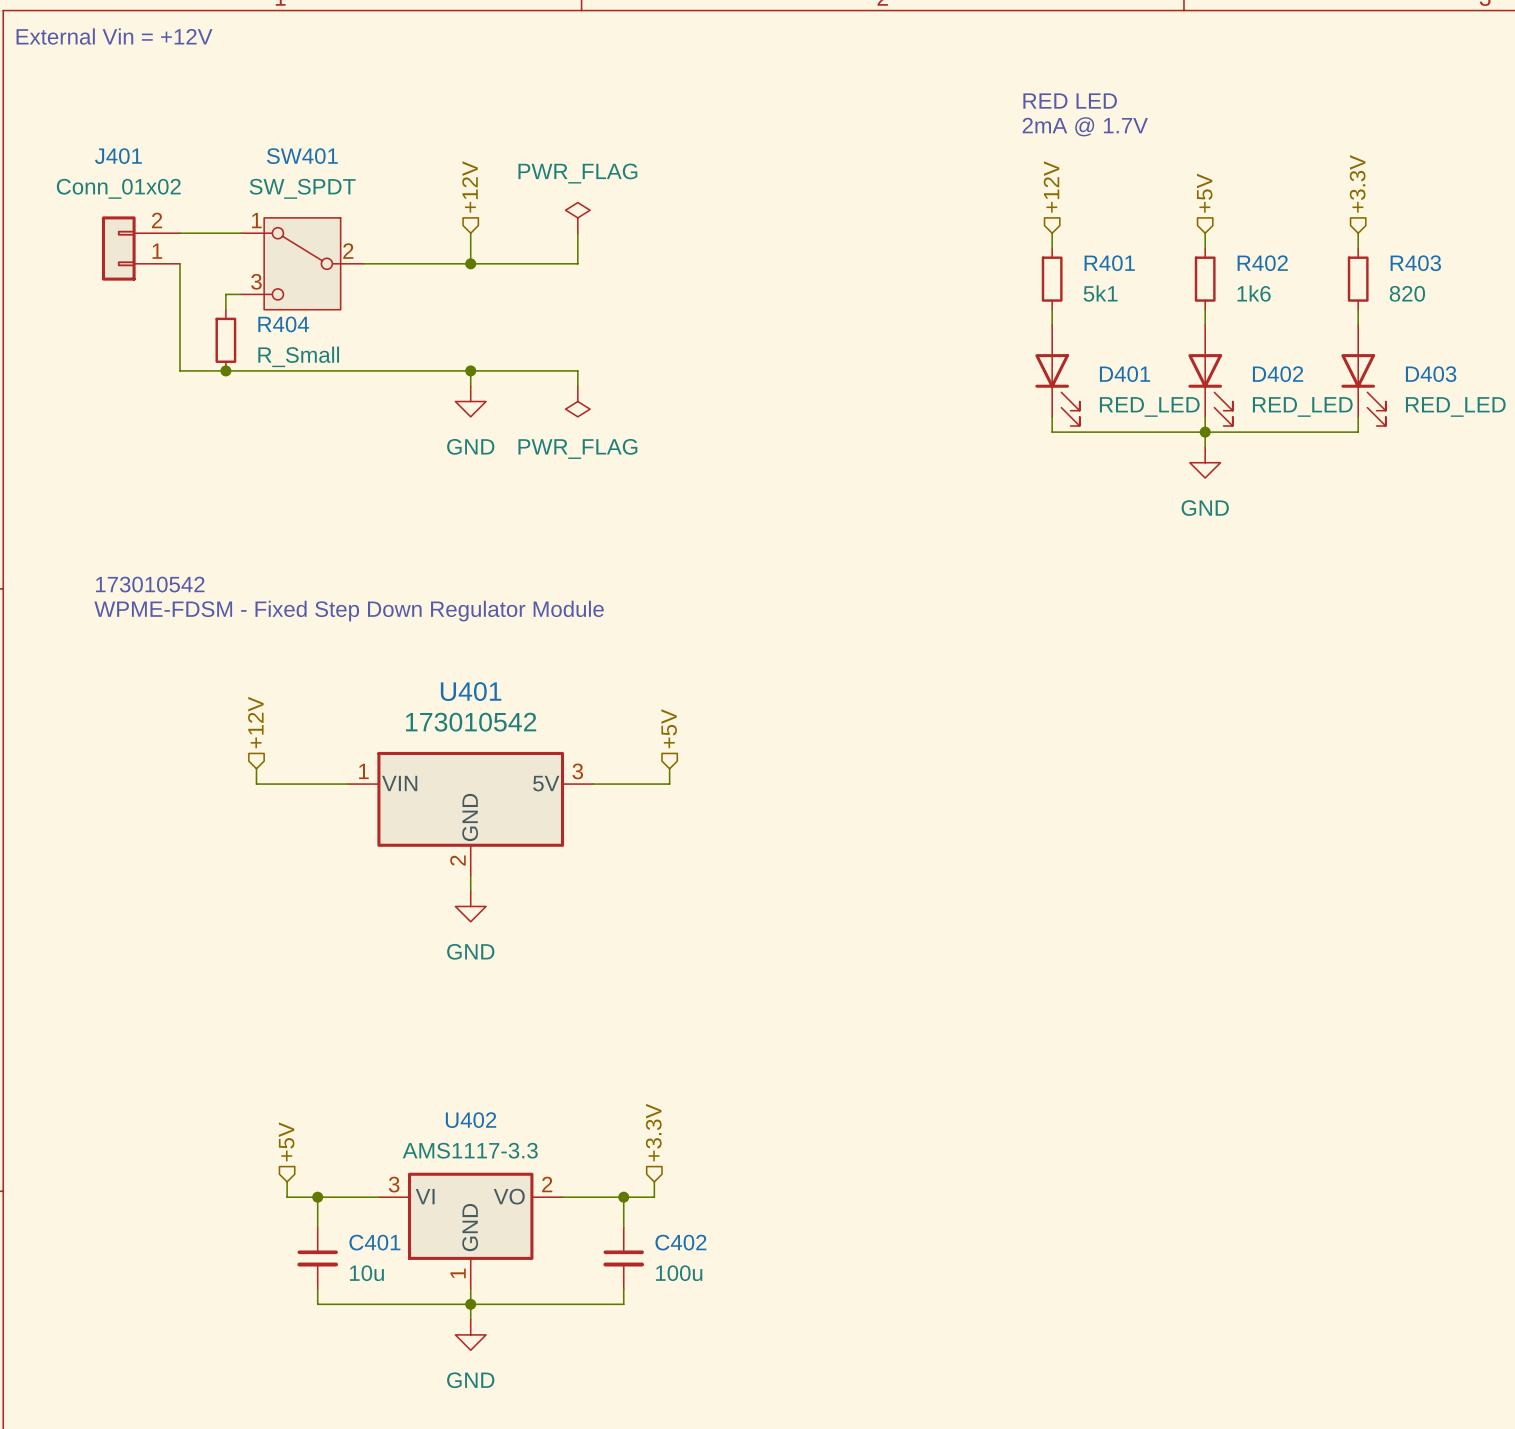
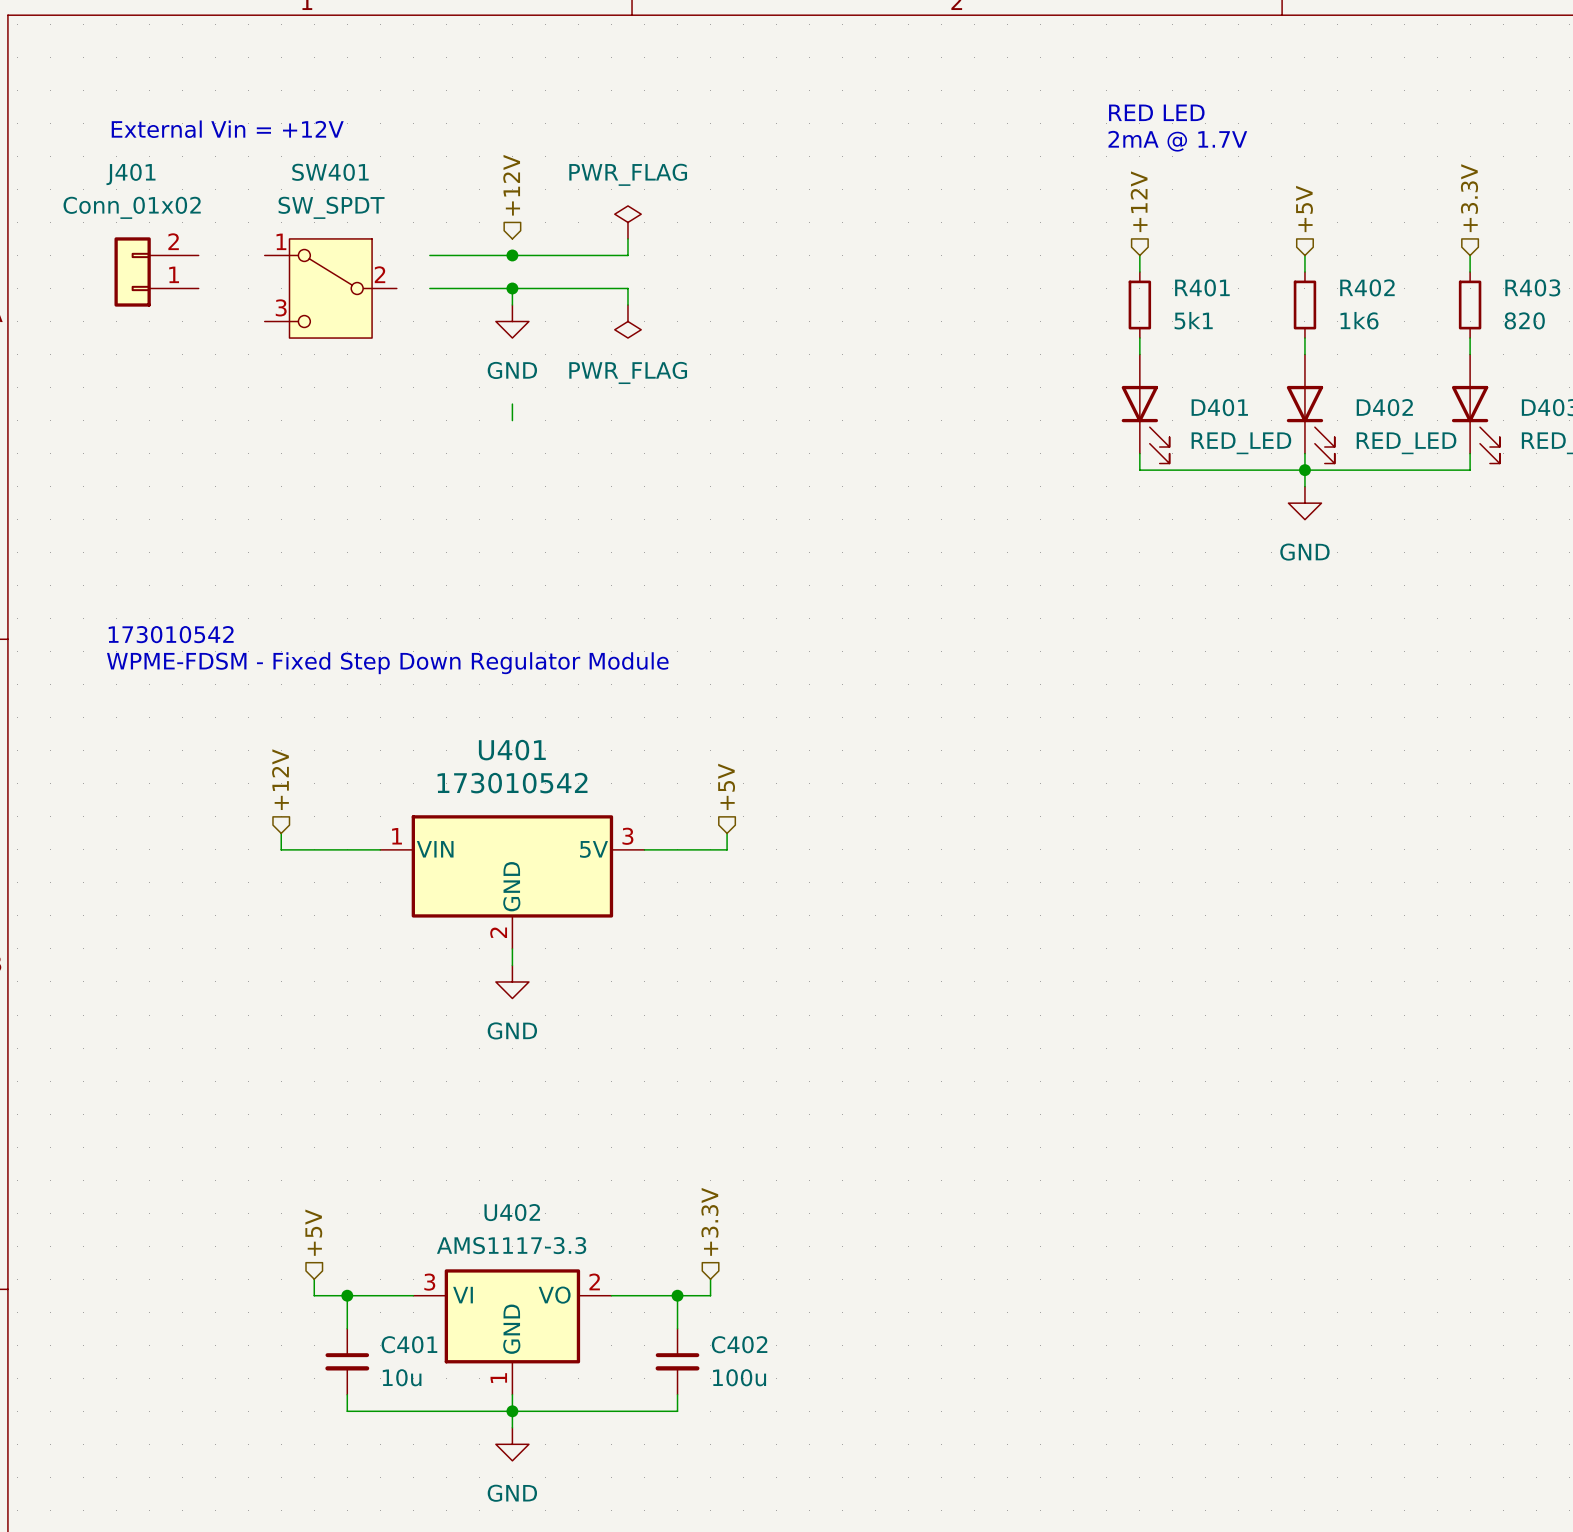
text position: External Vin = +12V (114, 36) -> External Vin = +12V (227, 129)
hierarchical label position: +12V (470, 187) -> +12V (511, 185)
wire: none -> (627, 238) (627, 255) (429, 255)
power symbol position: PWR_FLAG (577, 217) -> PWR_FLAG (627, 222)
wire: (179, 233) (241, 233) -> none
wire: (470, 233) (470, 263) -> (512, 305) (512, 288)
junction: none -> (512, 255)
wire: (577, 233) (577, 263) -> (627, 305) (627, 288)
wire: (179, 263) (179, 370) (577, 370) (577, 386) -> none
wire: (363, 263) (394, 263) -> none
wire: (241, 294) (225, 294) (225, 309) -> none
power symbol: none -> PWR_FLAG (627, 321)
R404: R_Small (225, 340) -> none
junction: (225, 370) -> none
junction: (470, 370) -> none
power symbol position: GND (470, 401) -> GND (512, 321)
power symbol: PWR_FLAG (577, 401) -> none

